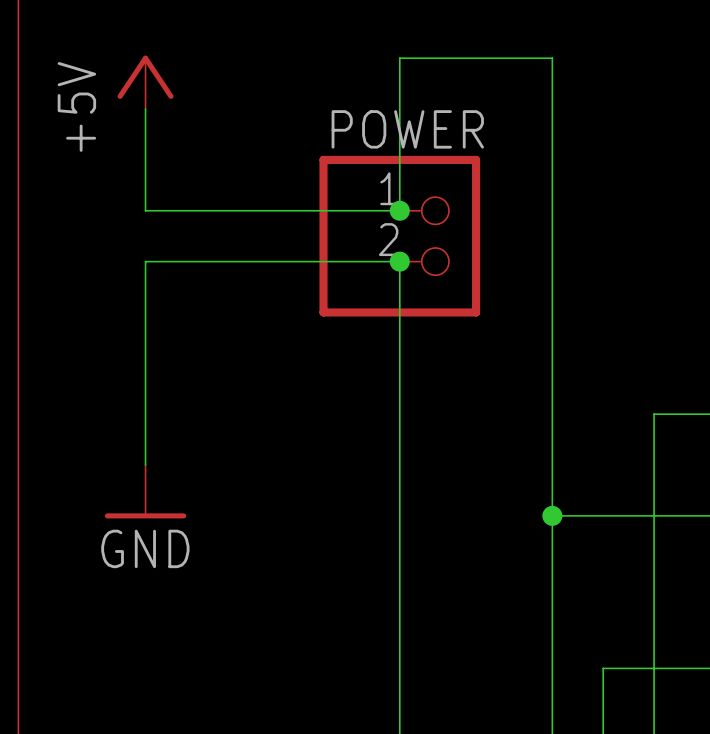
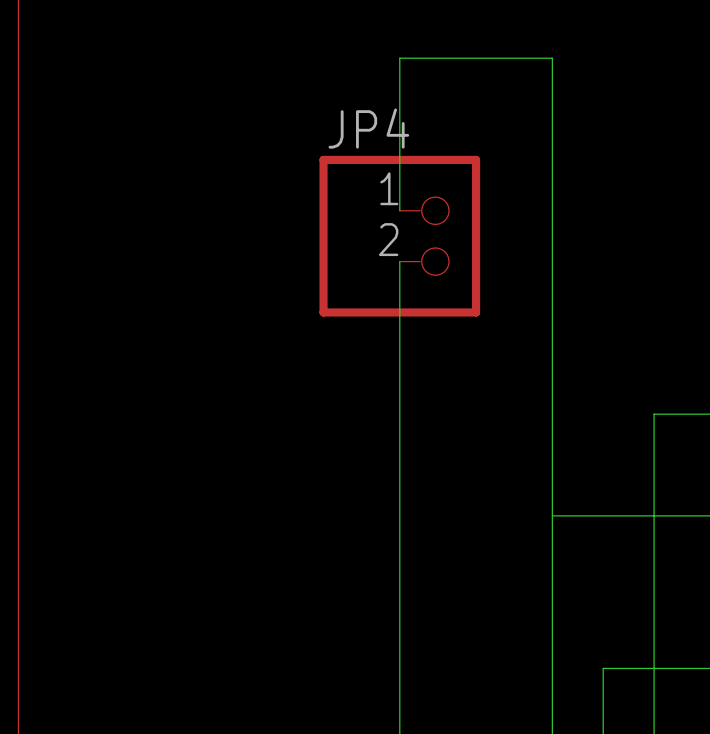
power symbol: +5V (145, 82) -> none
wire: (145, 109) (145, 210) (399, 210) -> none
POWER name: POWER (407, 129) -> JP4 (368, 128)
junction: (399, 210) -> none
wire: (399, 261) (145, 261) (145, 465) -> none
junction: (399, 261) -> none
power symbol: GND (145, 491) -> none
junction: (552, 515) -> none

